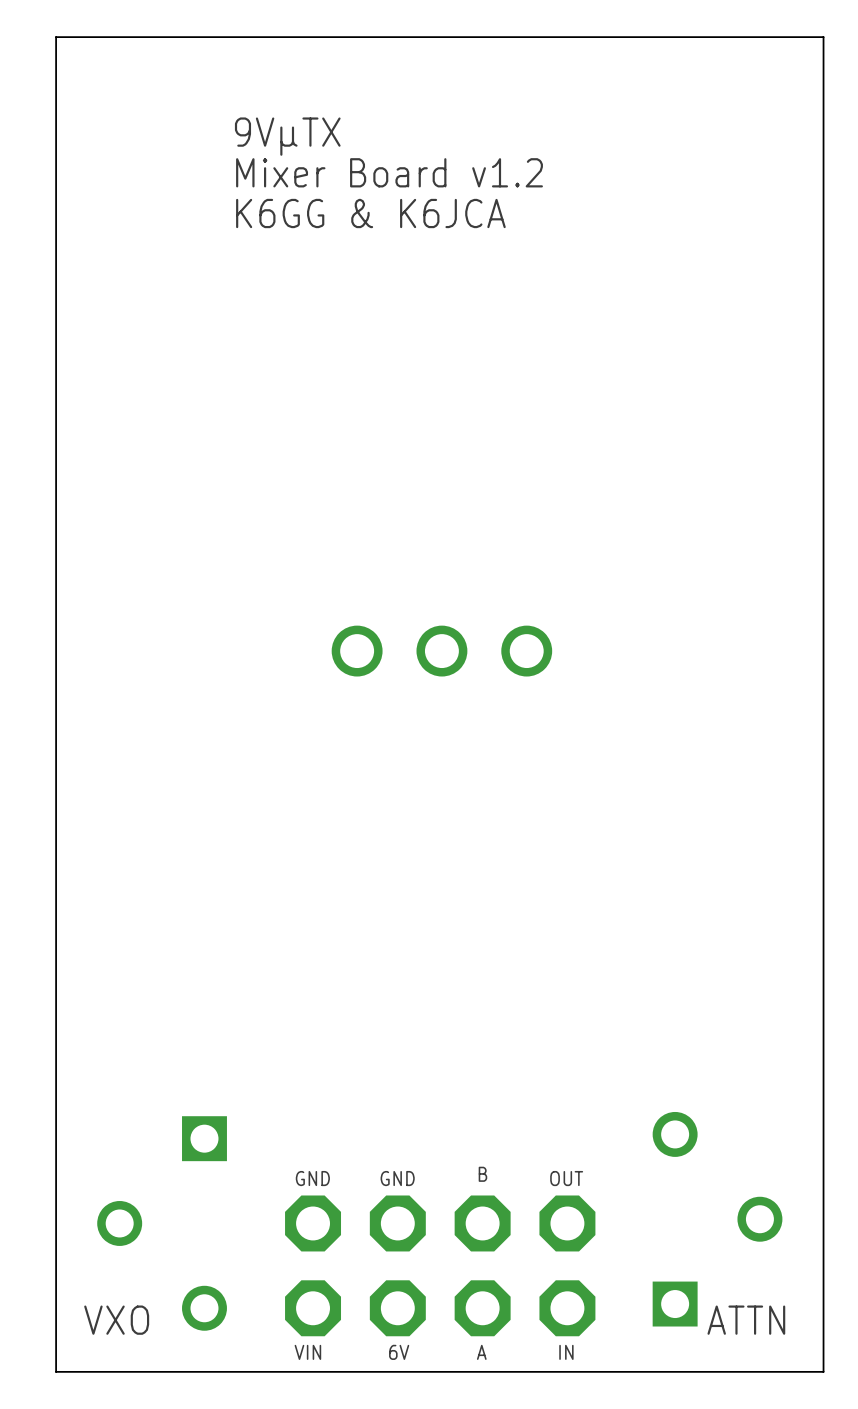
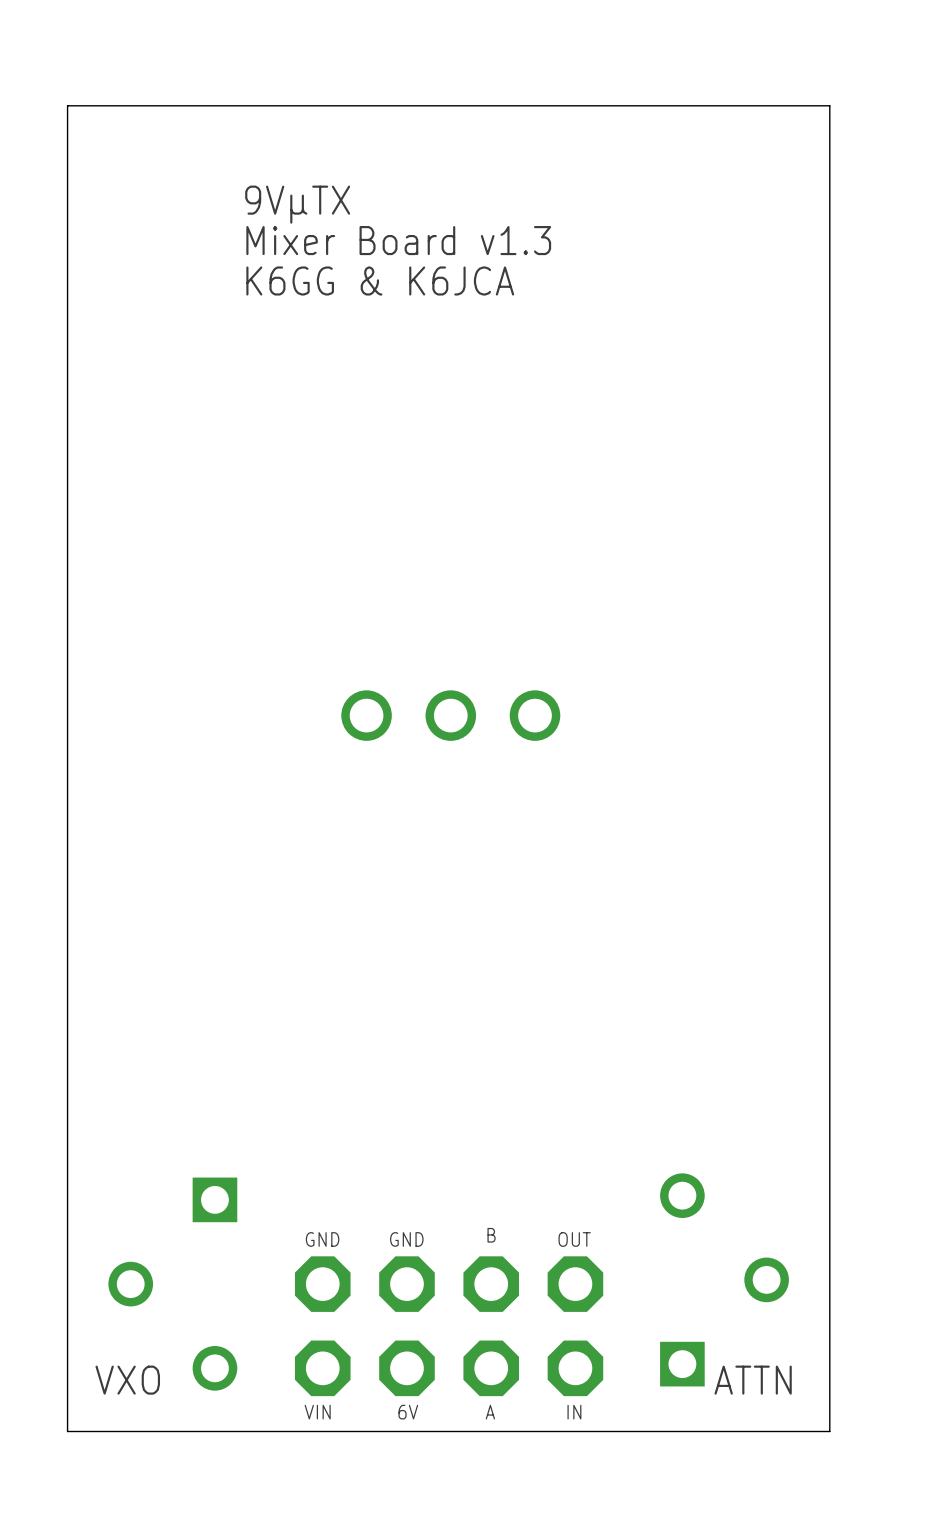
text: Mixer Board v1.2 (389, 172) -> Mixer Board v1.3 (398, 240)

